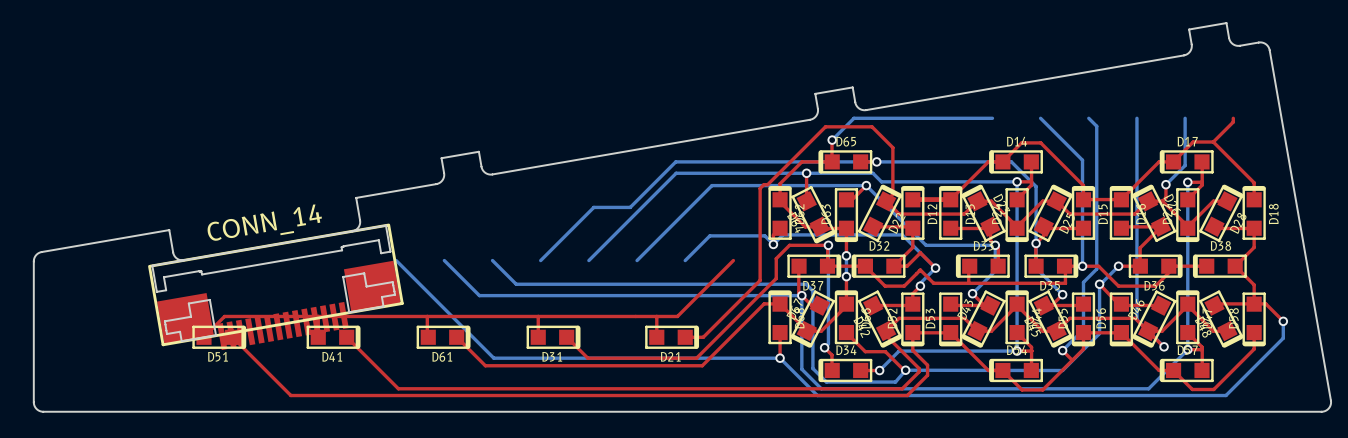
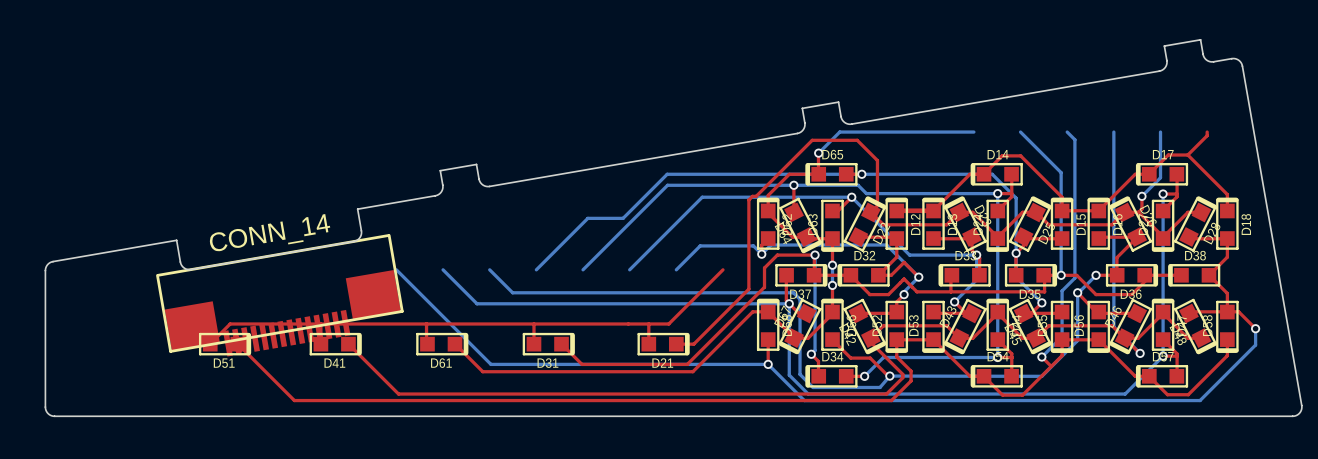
board edge: (352, 231) (385, 225) (390, 251) (381, 253) (378, 240) (343, 246) (342, 250) (201, 274) (199, 271) (163, 277) (166, 290) (156, 291) (152, 265) (184, 260) -> none
board edge: (364, 273) (343, 276) (349, 312) (383, 306) (381, 297) (395, 294) (392, 282) (366, 286) (364, 273) -> none
board edge: (209, 299) (188, 303) (191, 316) (164, 321) (166, 334) (180, 331) (181, 341) (216, 335) (209, 299) -> none

